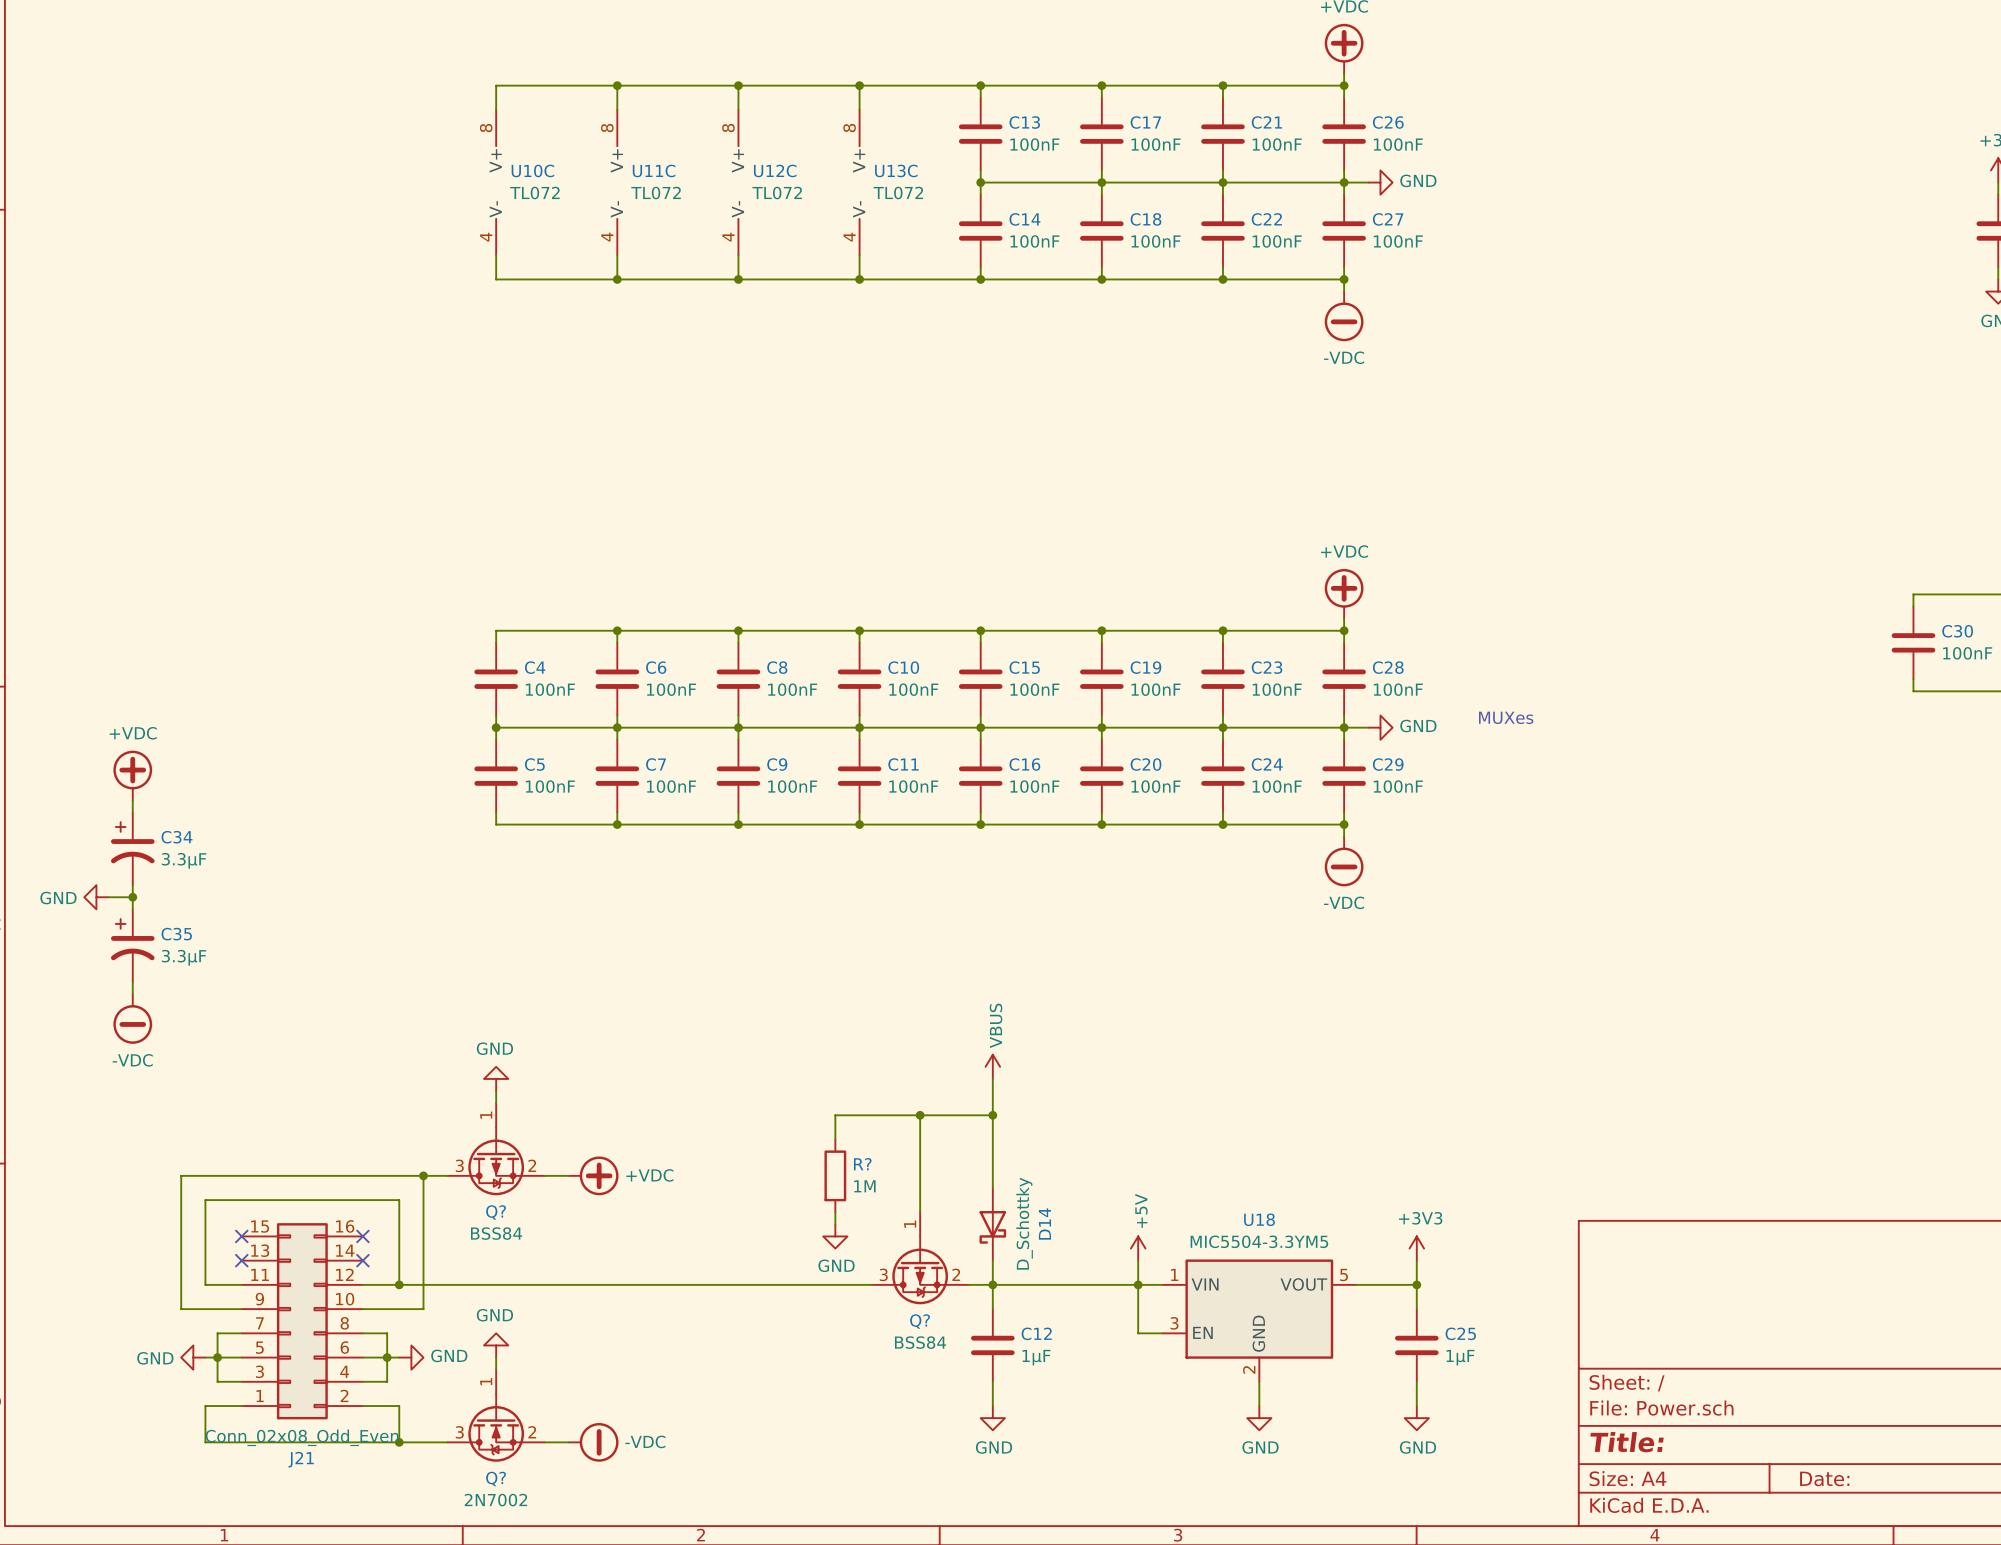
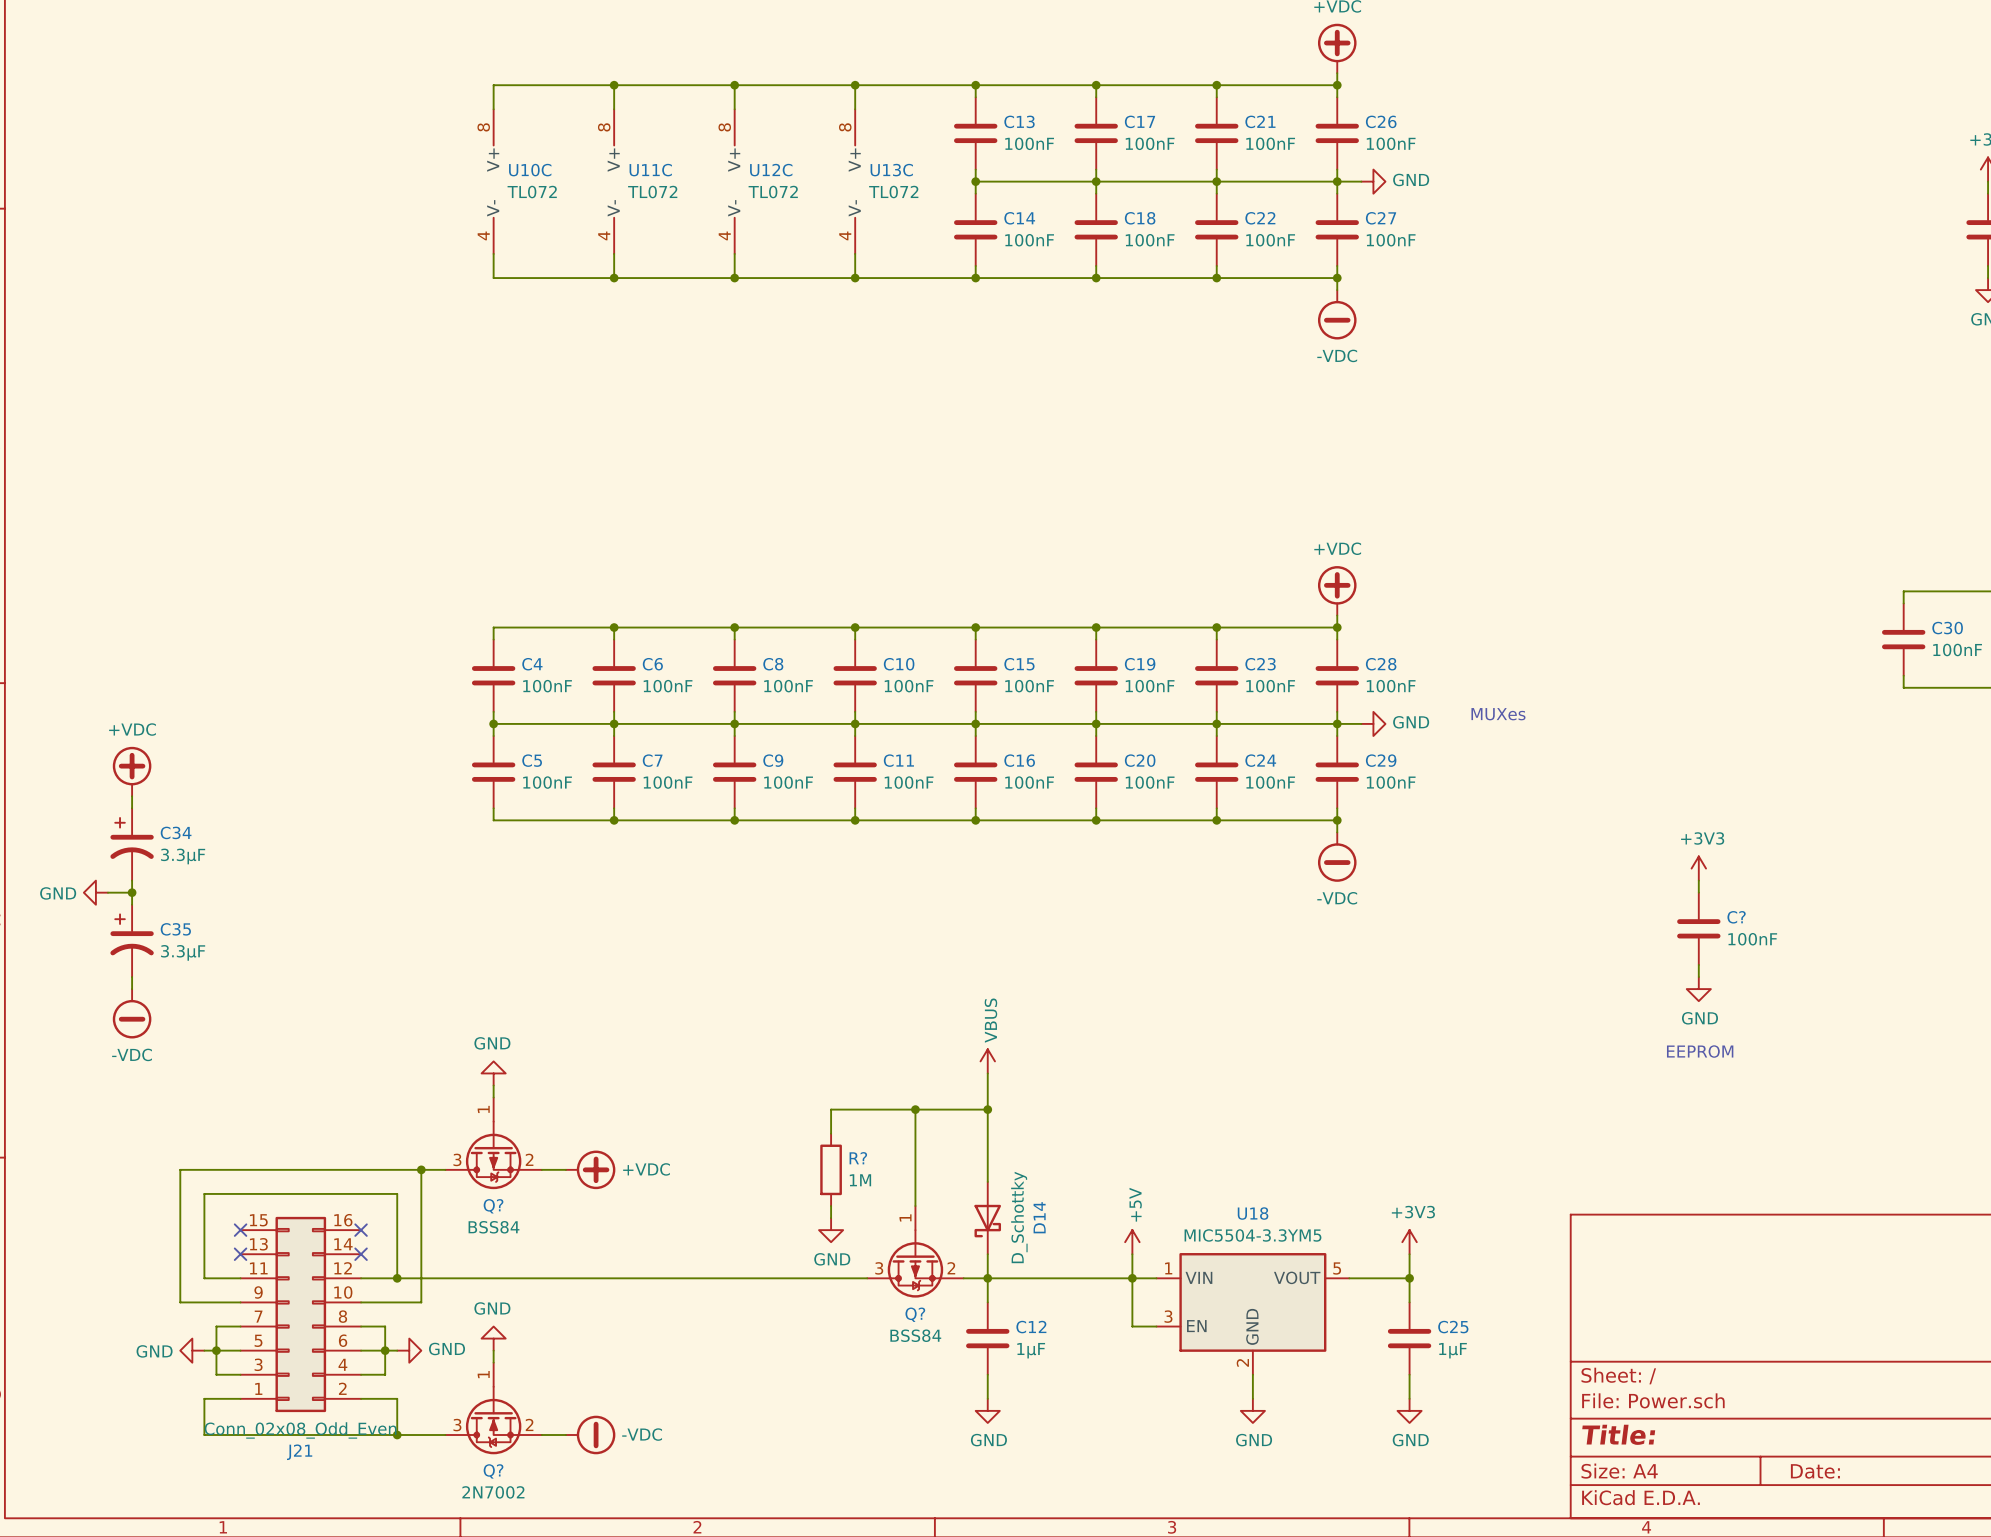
power symbol: none -> +3V3 (1698, 868)
wire: none -> (1698, 880) (1698, 892)
C?: none -> 100nF (1698, 928)
wire: none -> (1698, 964) (1698, 977)
power symbol: none -> GND (1698, 989)
text: none -> EEPROM (1700, 1051)

